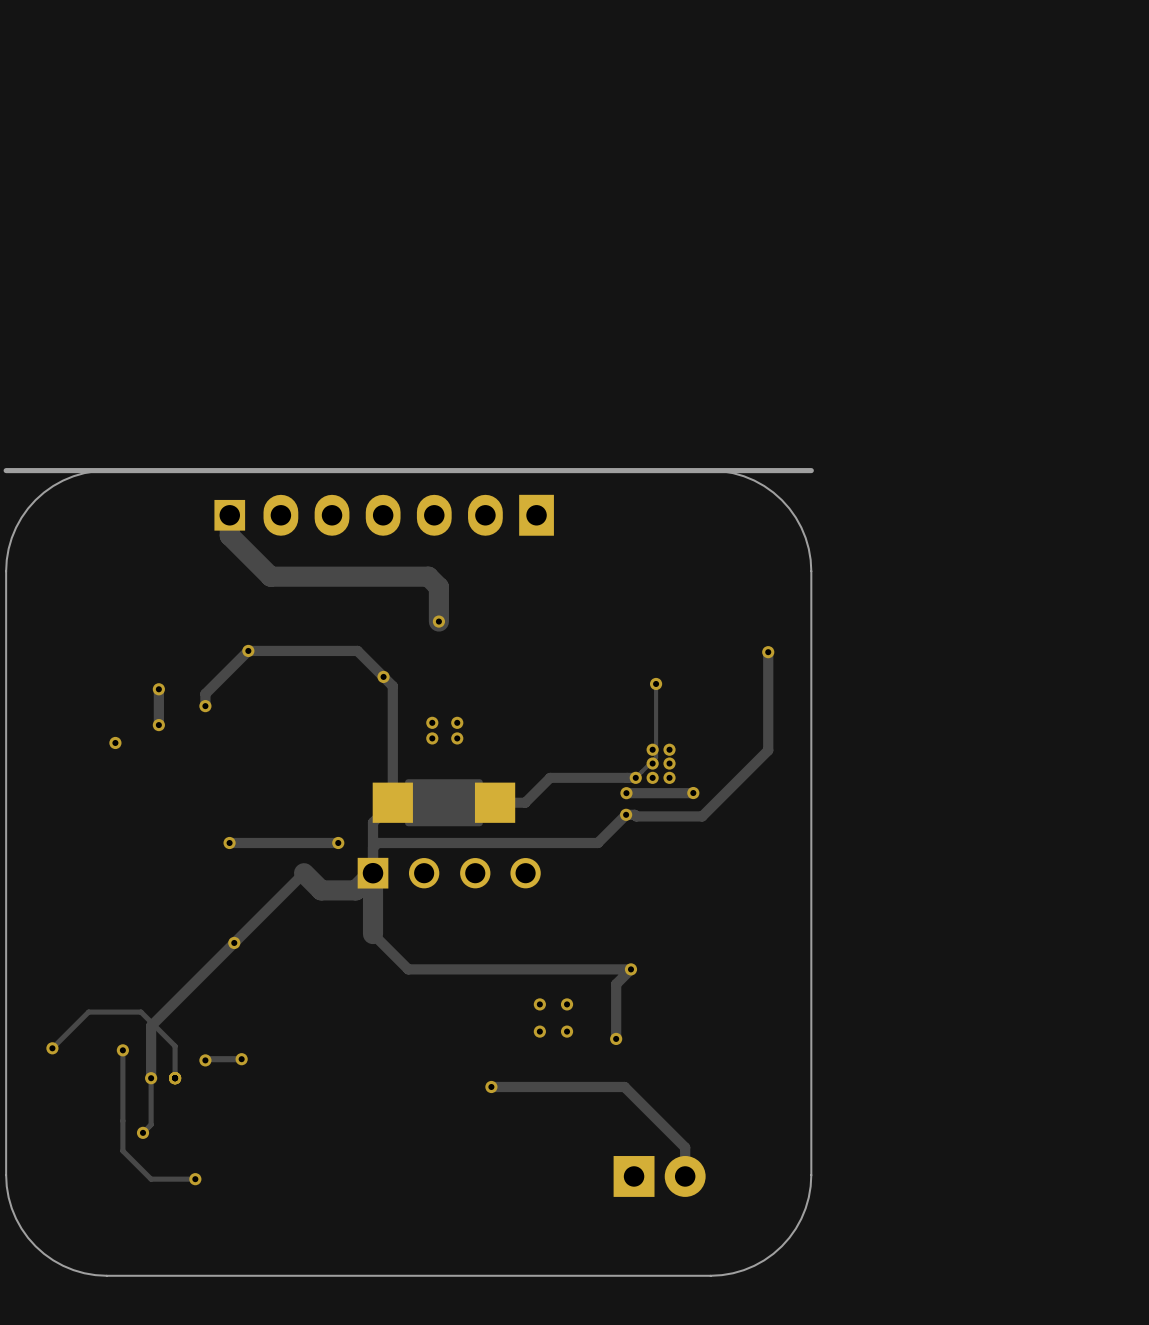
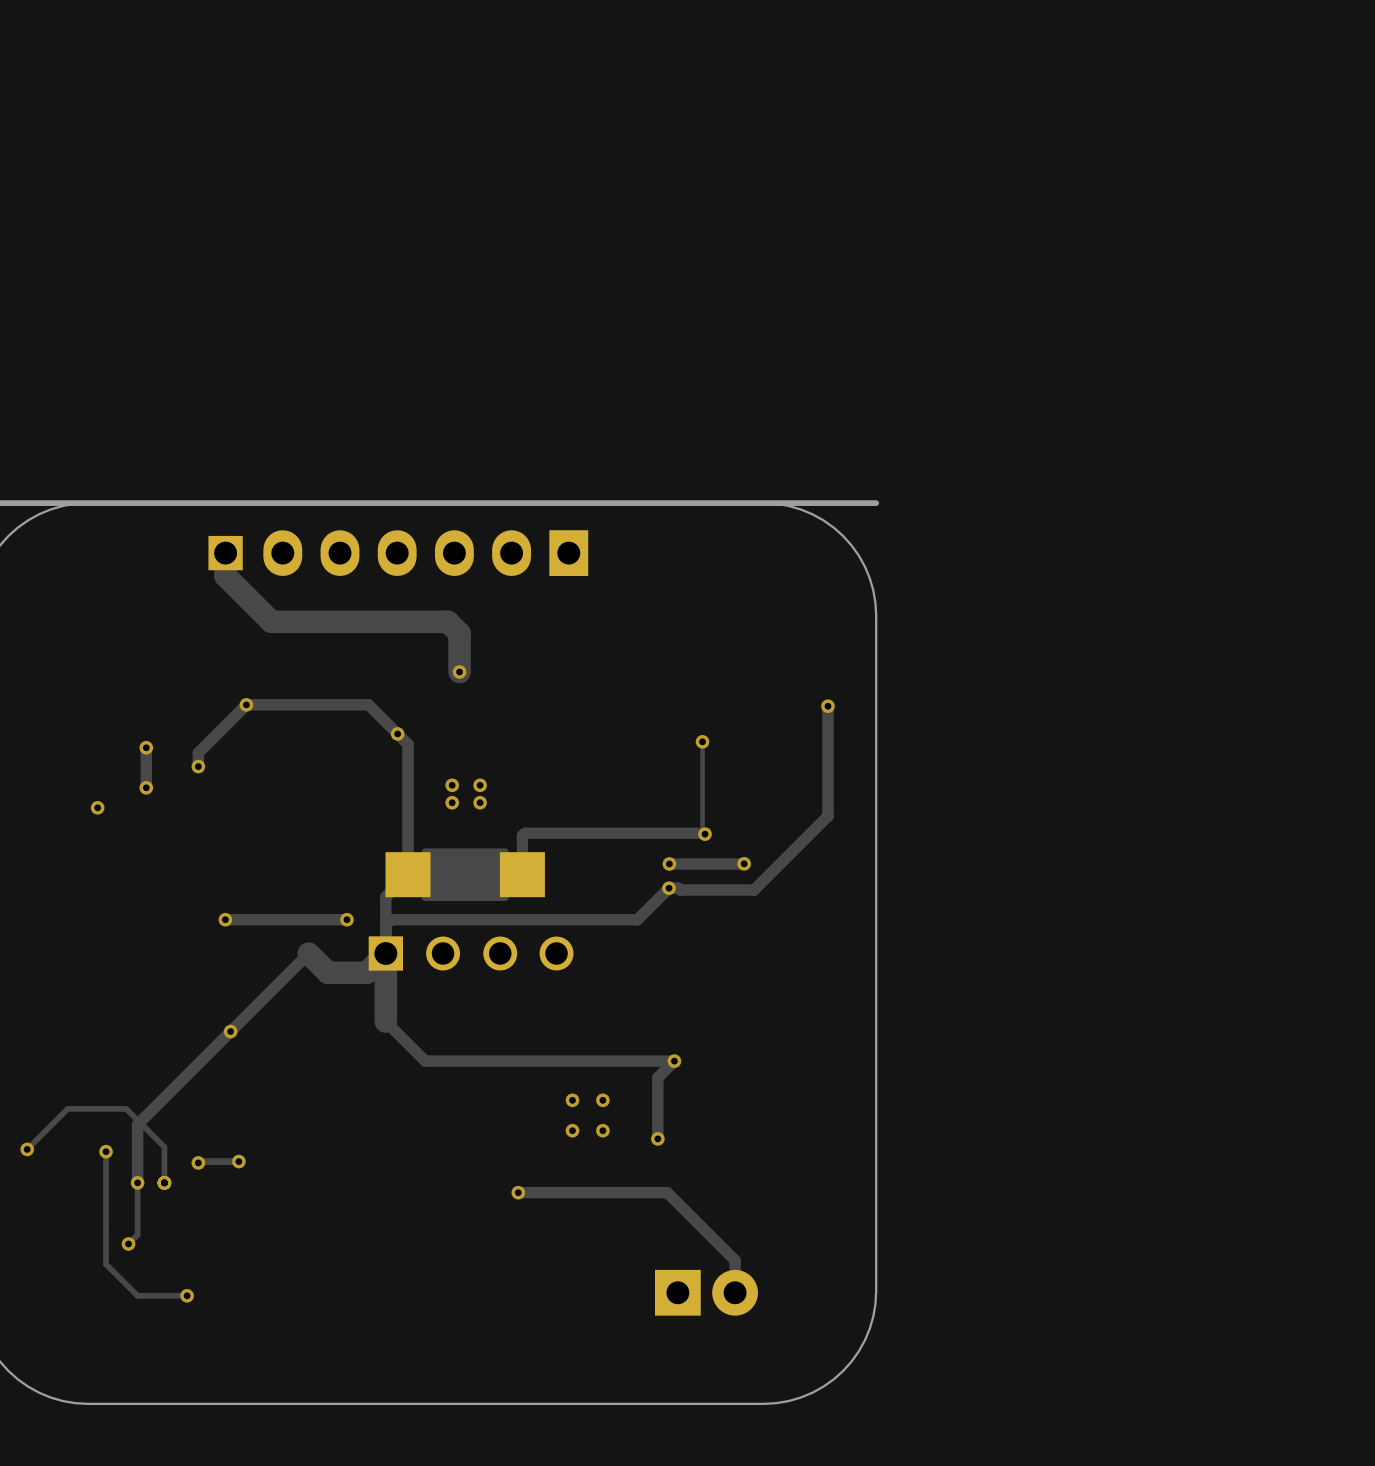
via: (652, 749) -> none
via: (669, 749) -> none
track: (656, 757) (635, 777) (550, 777) (525, 802) (495, 802) -> (702, 824) (702, 831) (705, 834) (524, 833) (522, 835) (522, 874)
via: (652, 763) -> none
via: (669, 763) -> none
via: none -> (705, 834)
via: (635, 777) -> none
via: (652, 777) -> none
via: (669, 777) -> none

